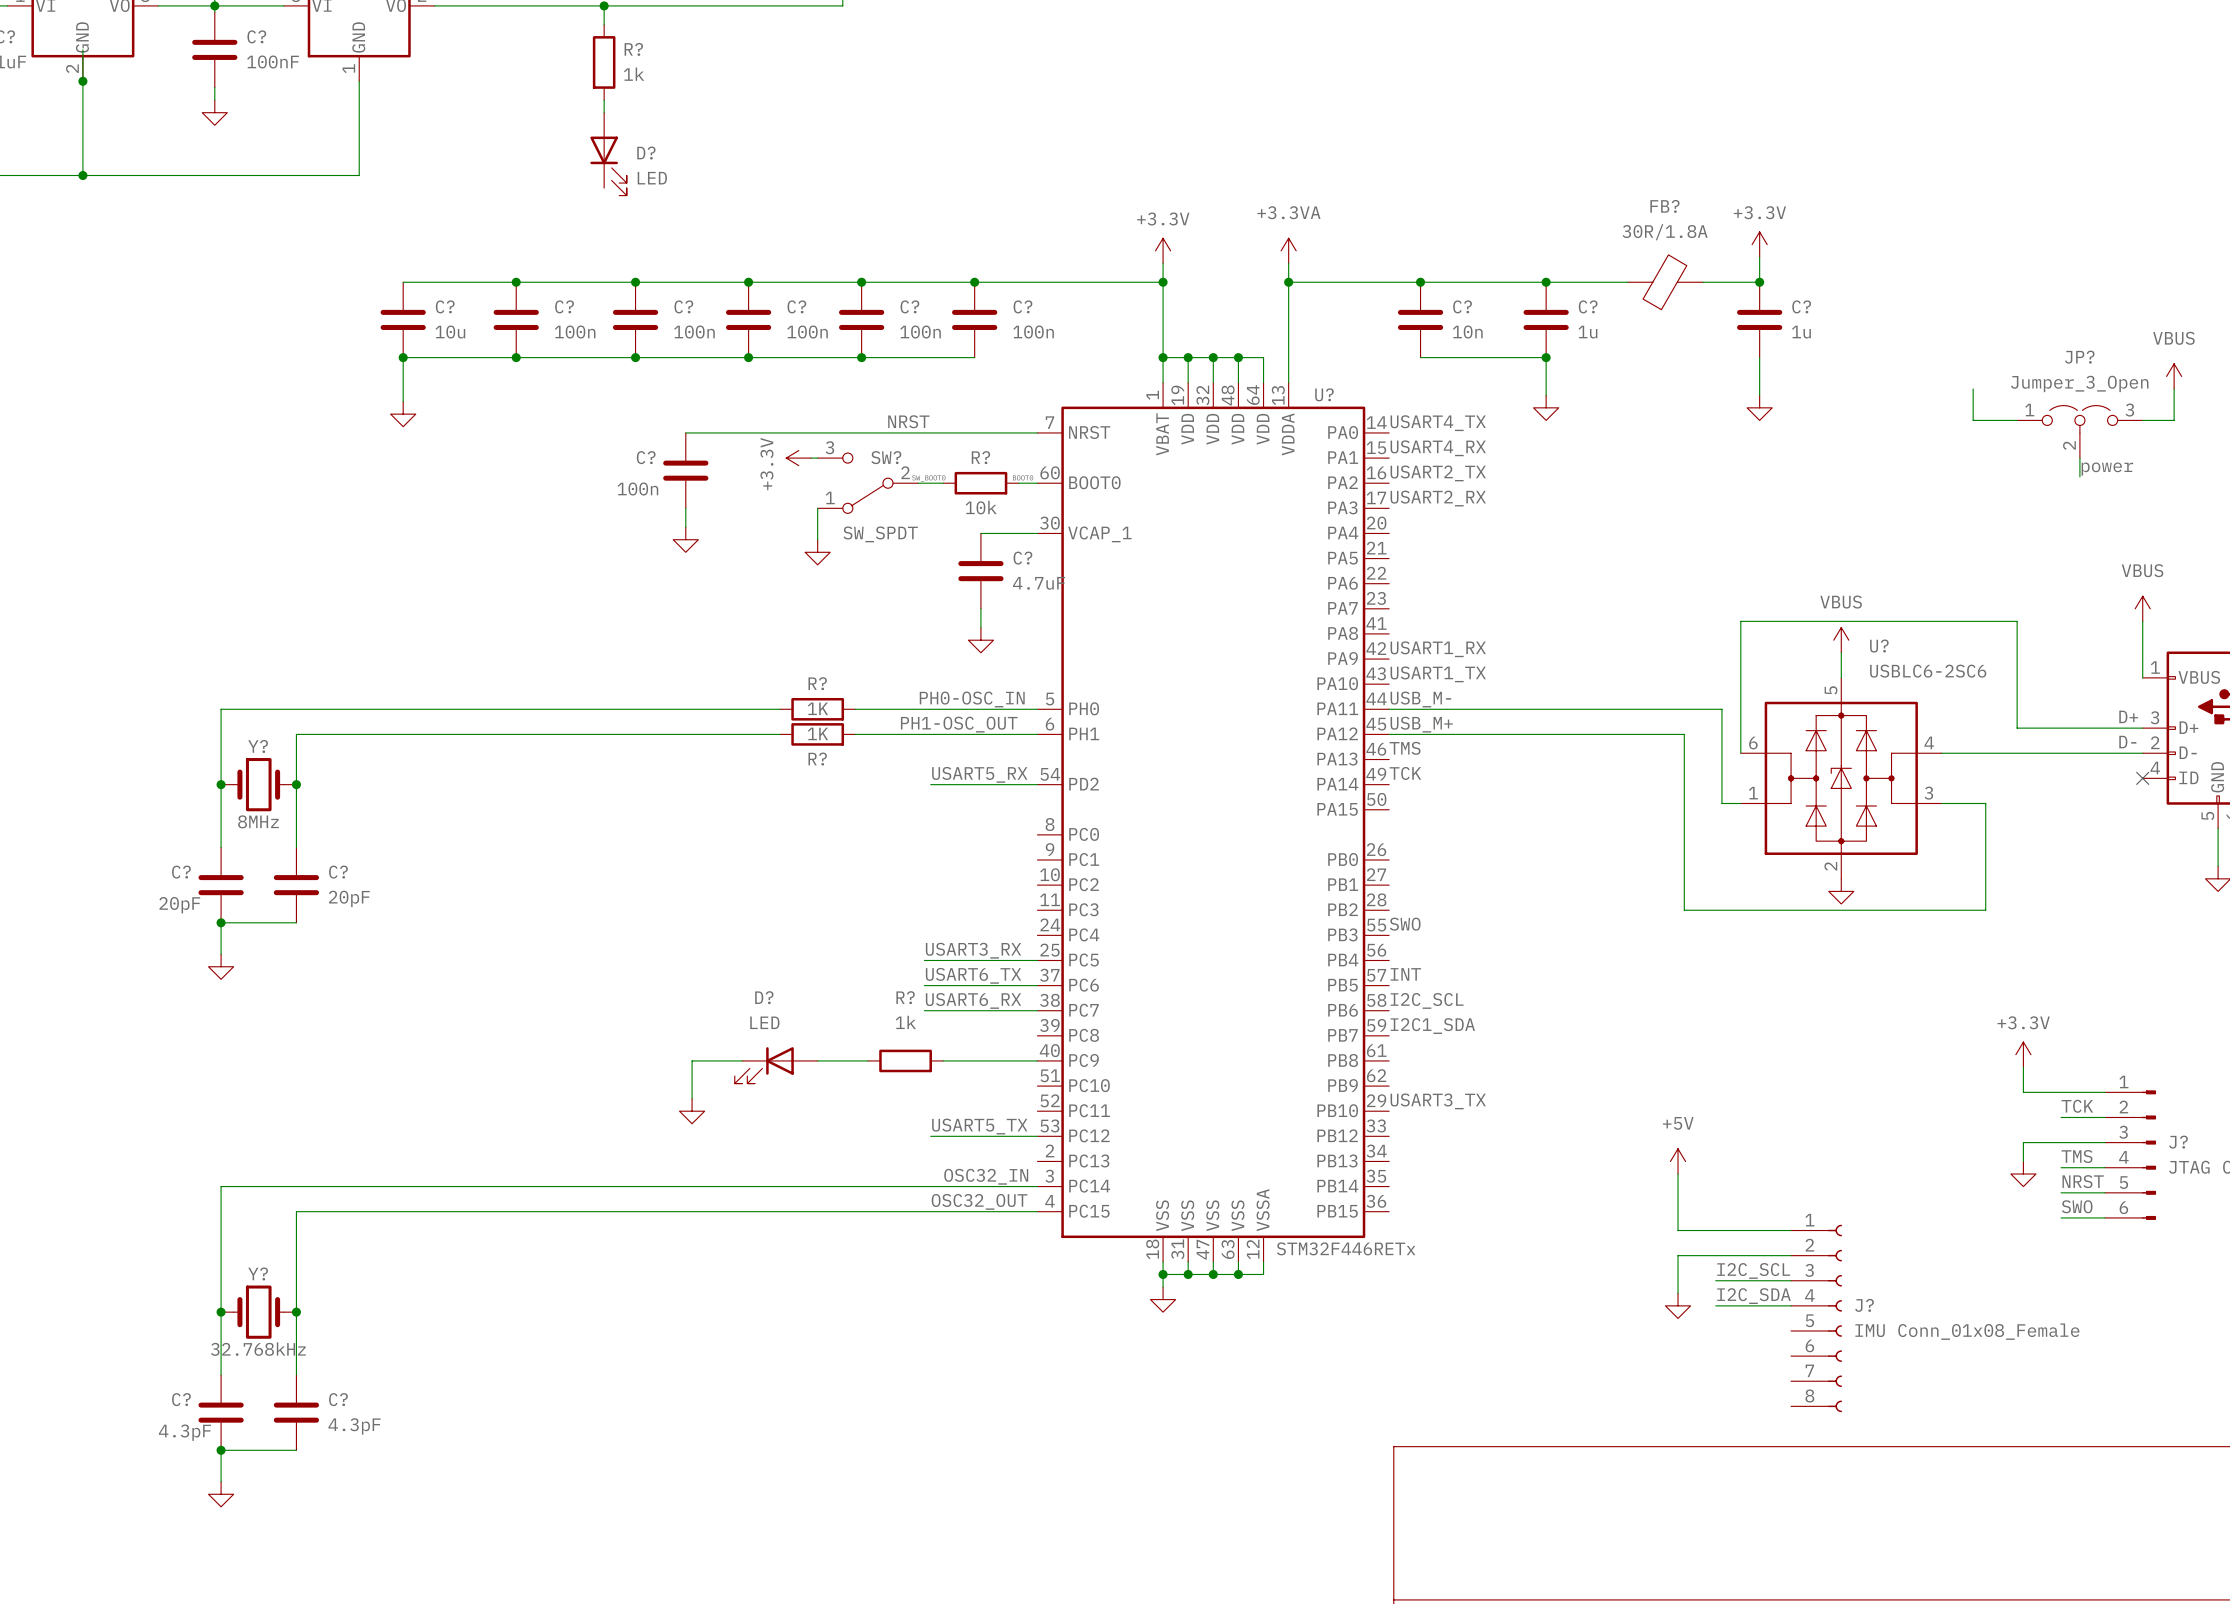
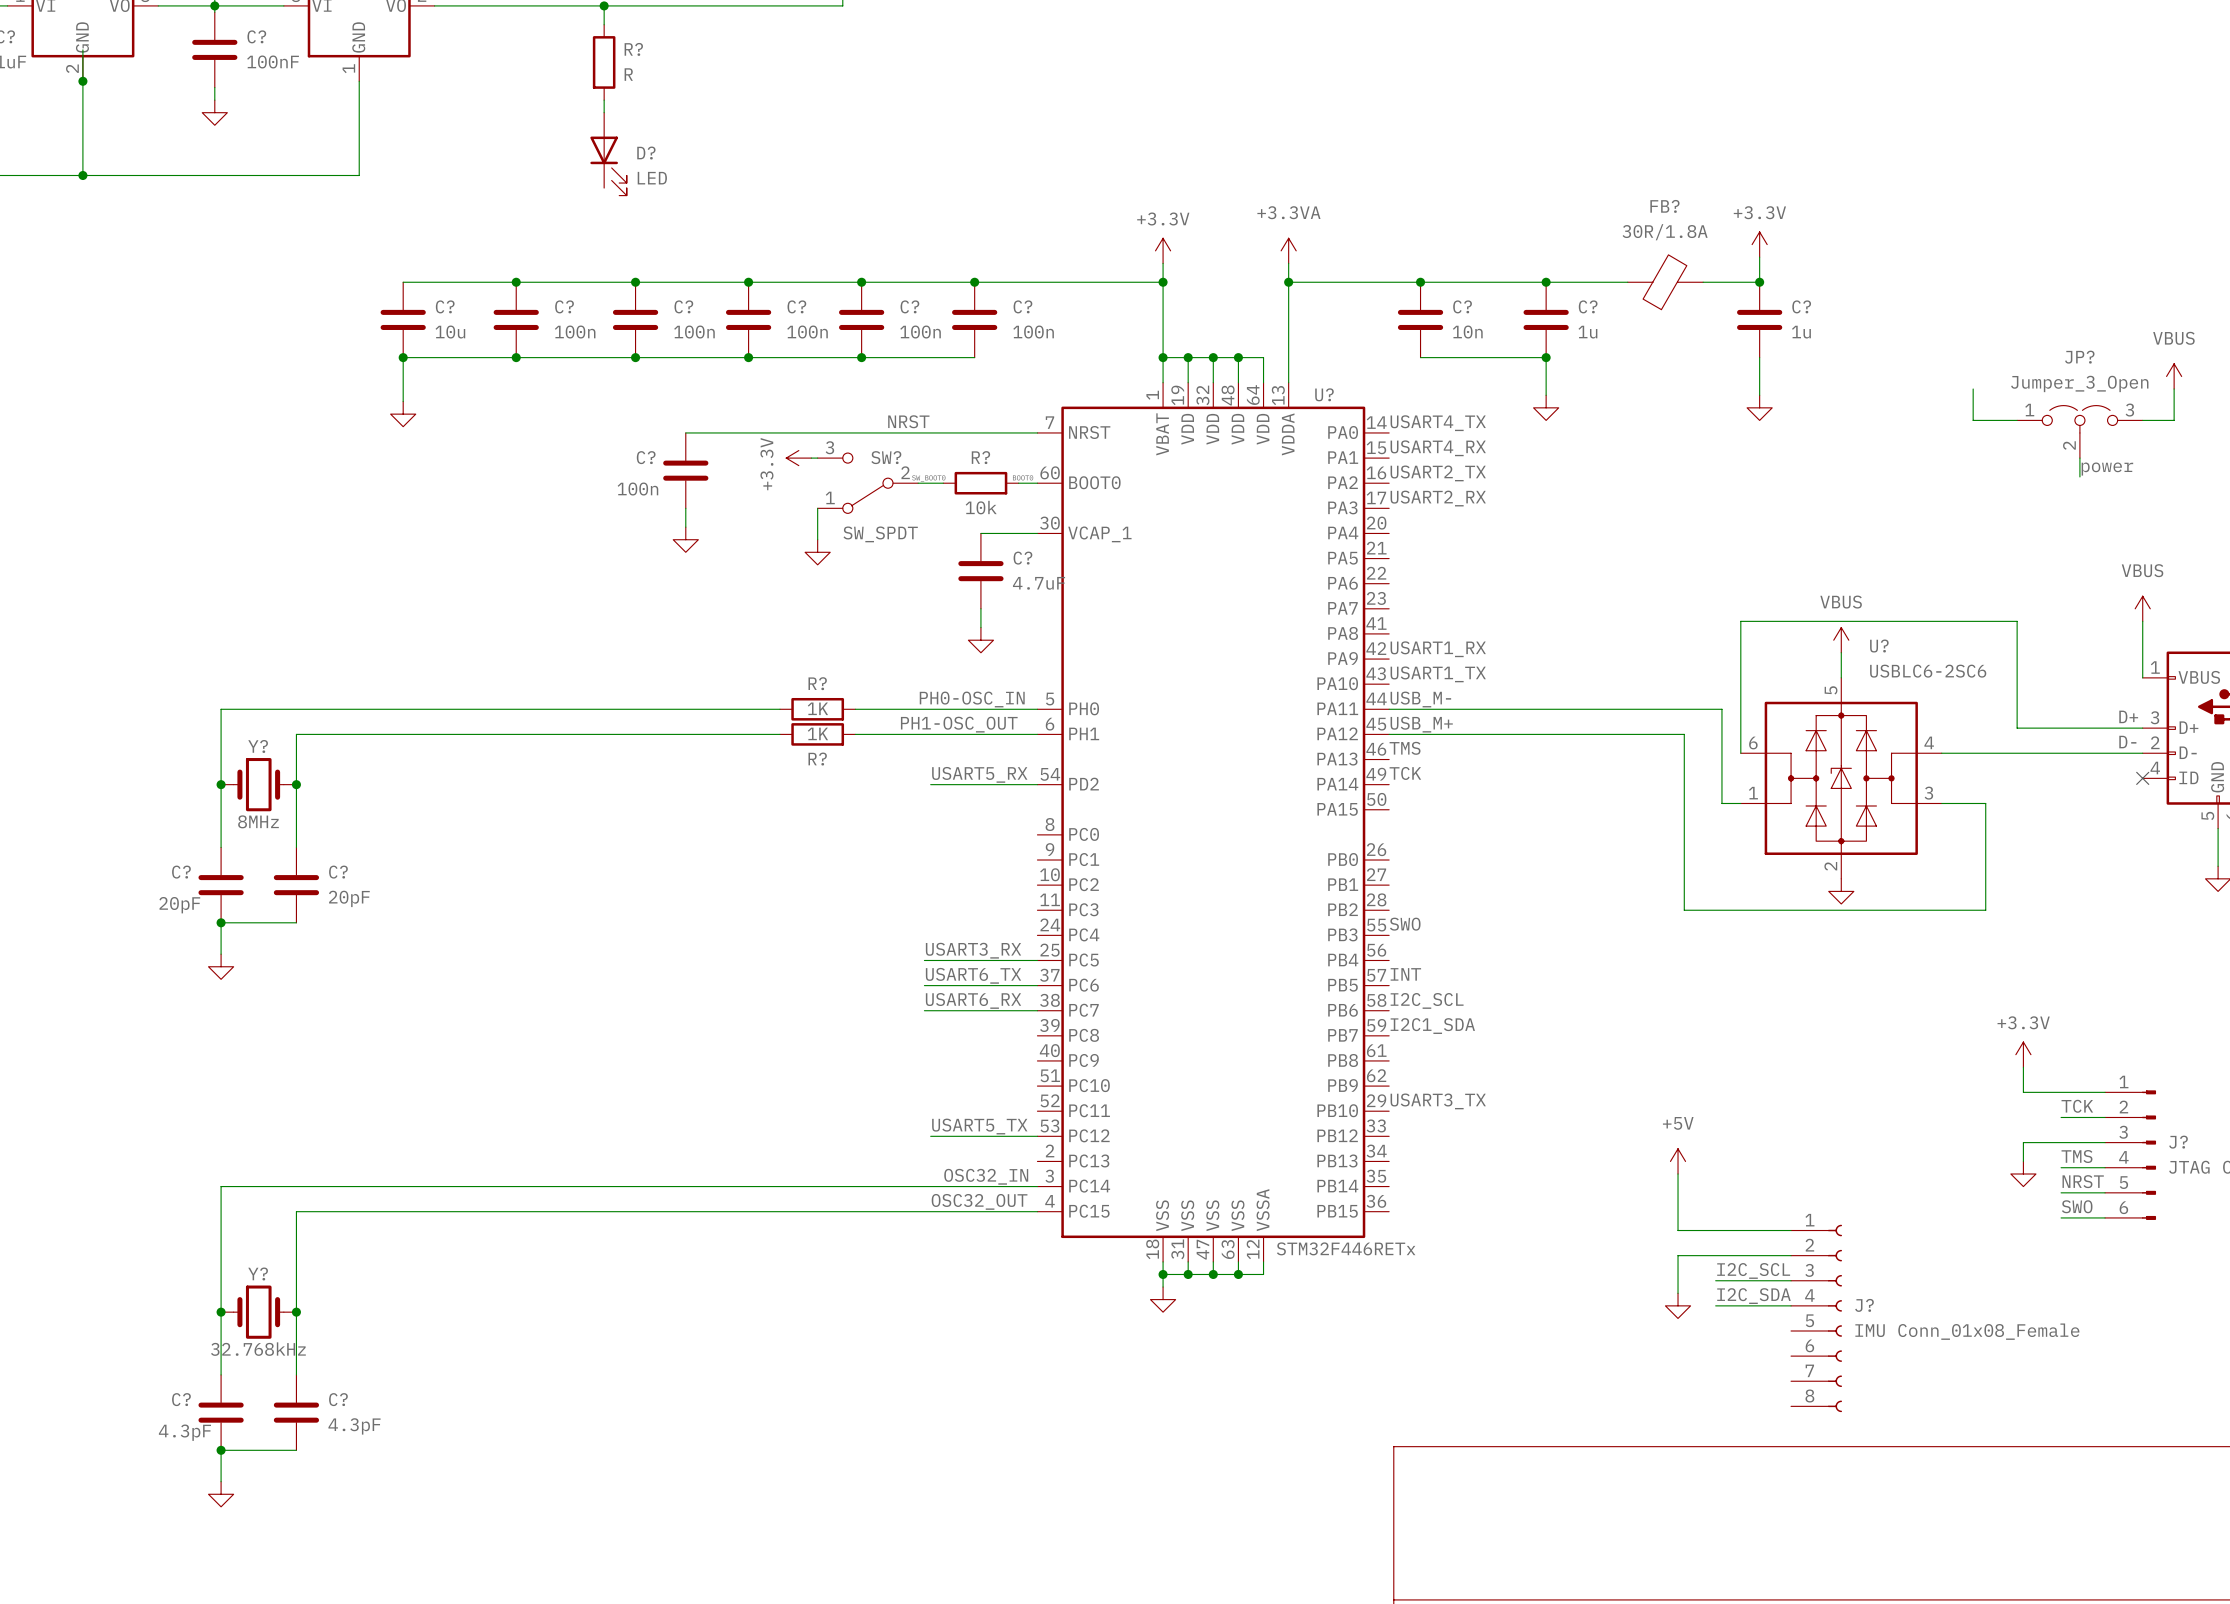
R? value: 1k (634, 74) -> R (628, 74)
wire: (742, 1060) (692, 1060) (692, 1098) -> none
wire: (817, 1060) (867, 1060) -> none
R?: 1k (905, 1060) -> none
wire: (943, 1060) (1037, 1060) -> none
D?: LED (776, 1065) -> none
power symbol: (692, 1111) -> none

